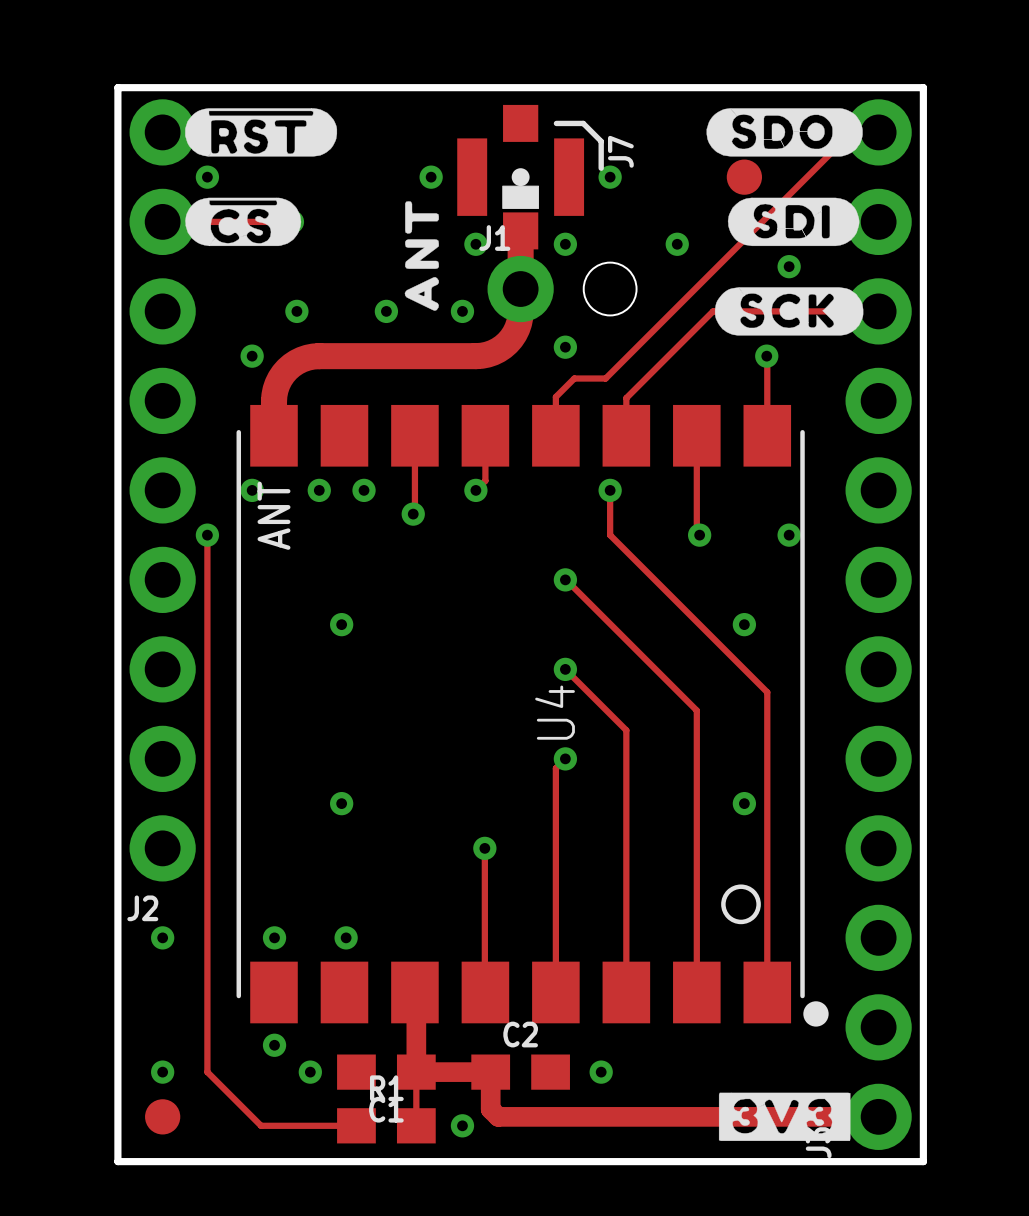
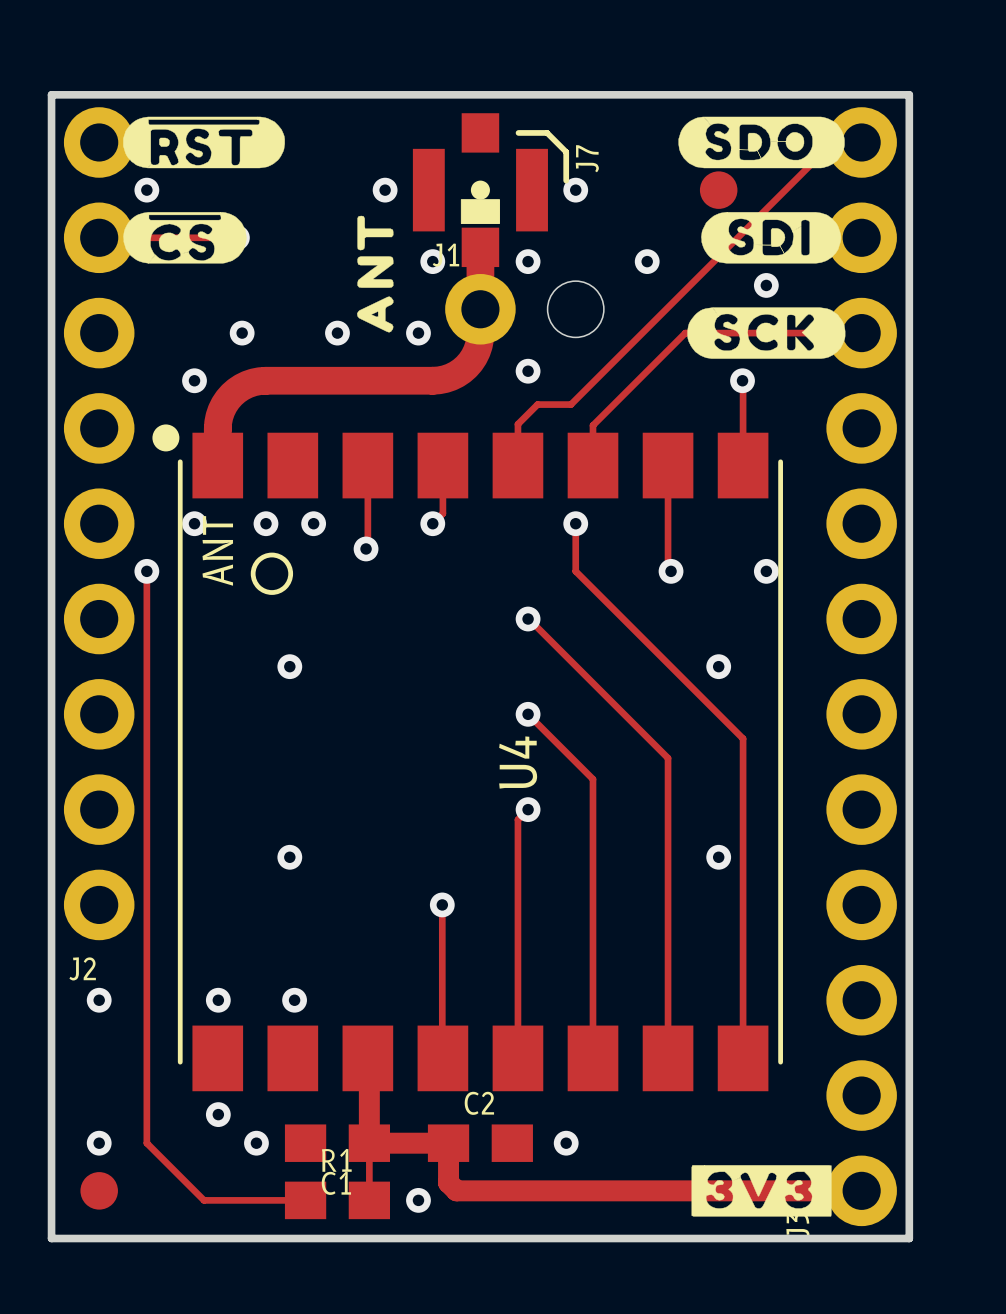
U4 footprint: [236, 404, 829, 1027] -> [152, 424, 783, 1092]

